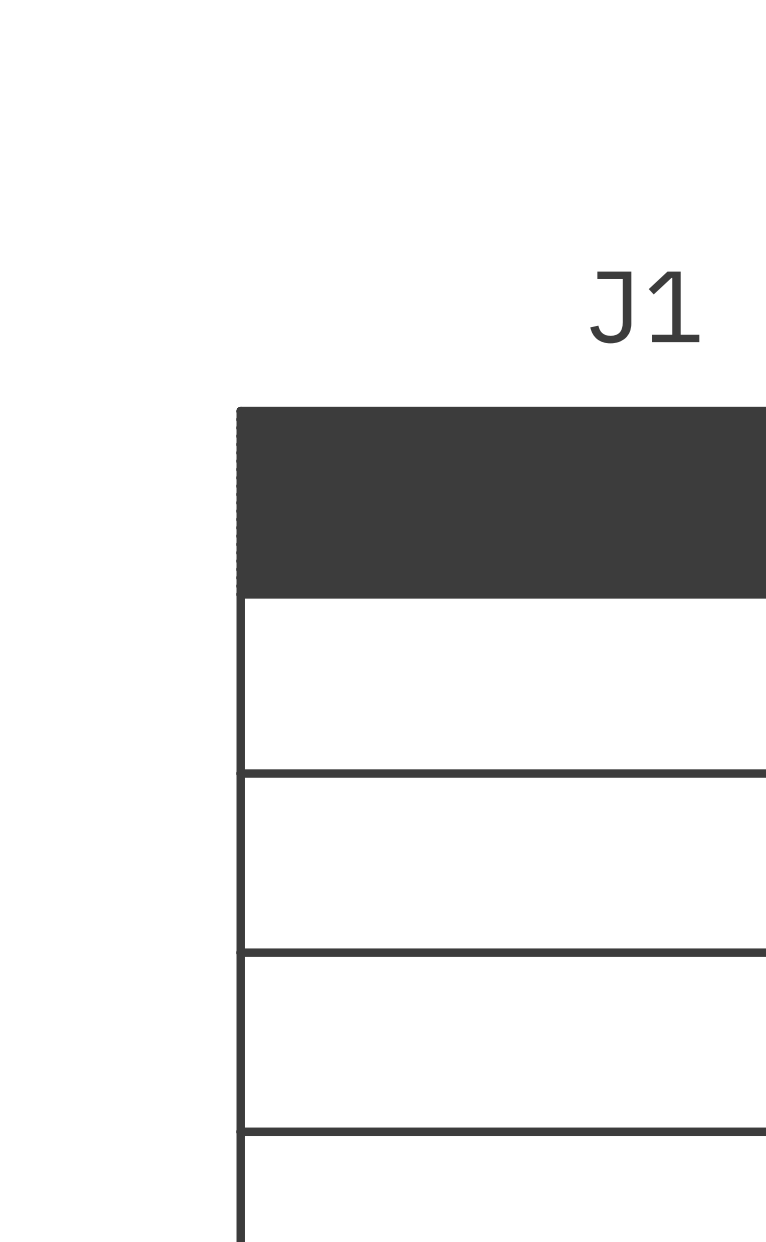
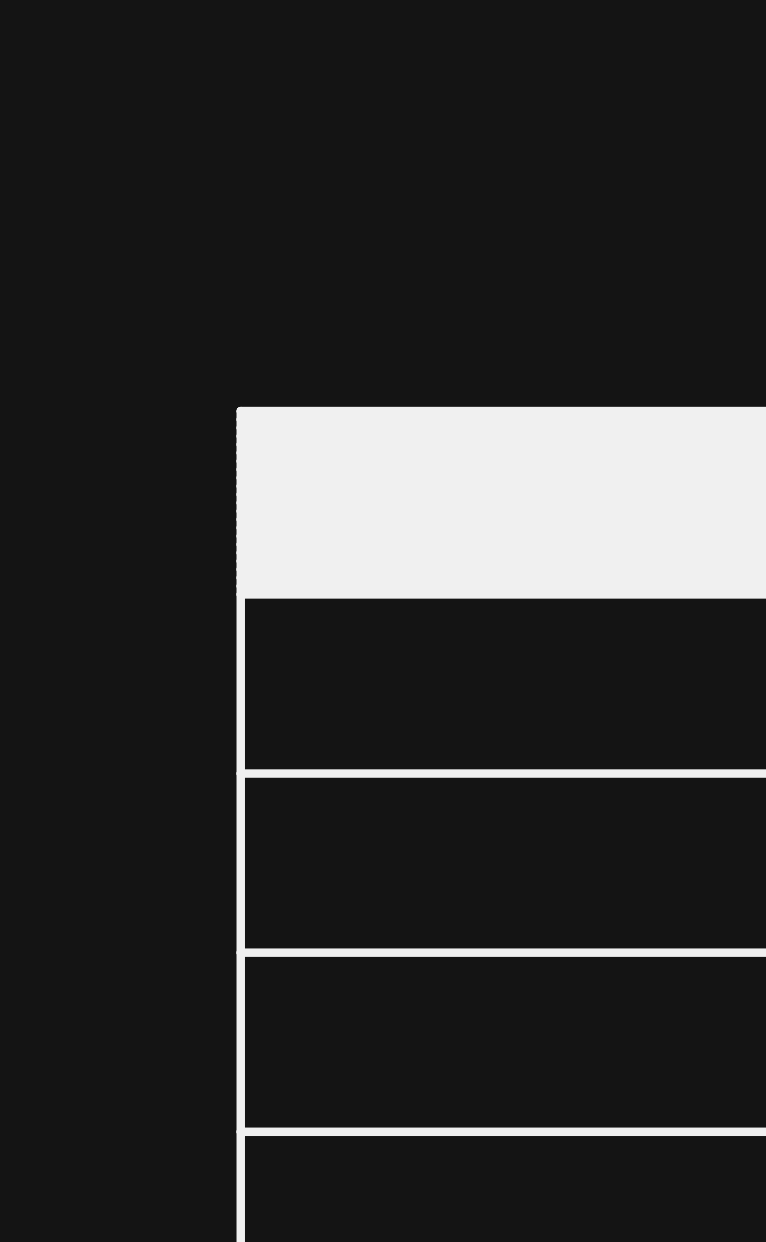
J1 name: J1 (644, 307) -> none

